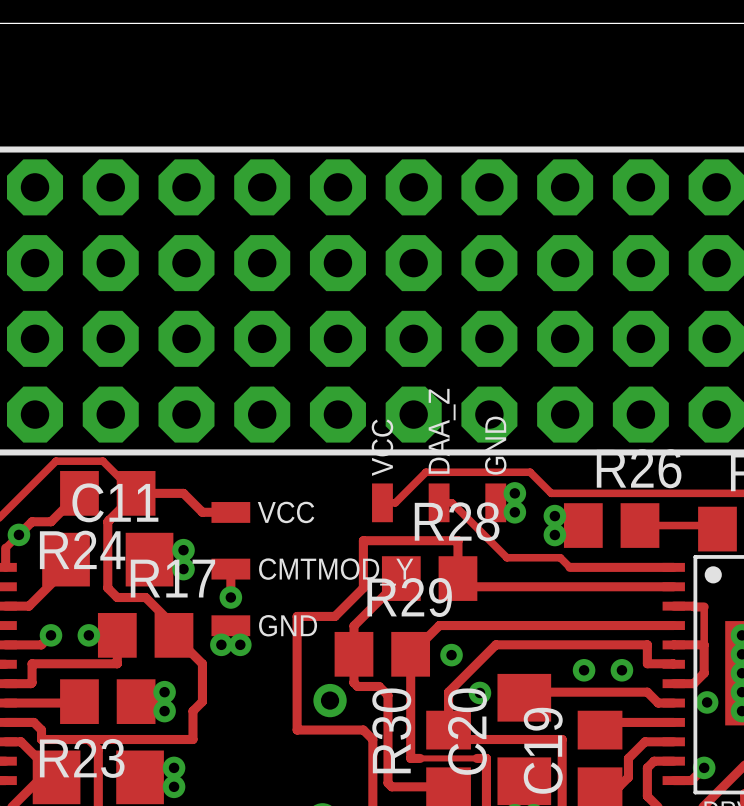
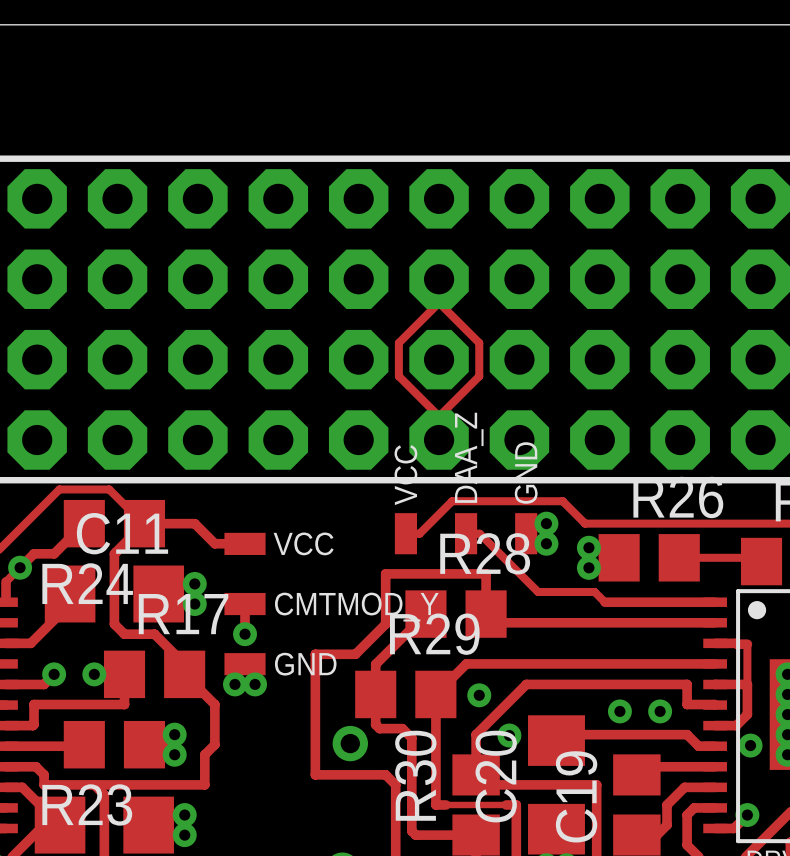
track: none -> (439, 302) (398, 342) (398, 376) (439, 416)
track: none -> (439, 302) (479, 342) (479, 376) (439, 416)

